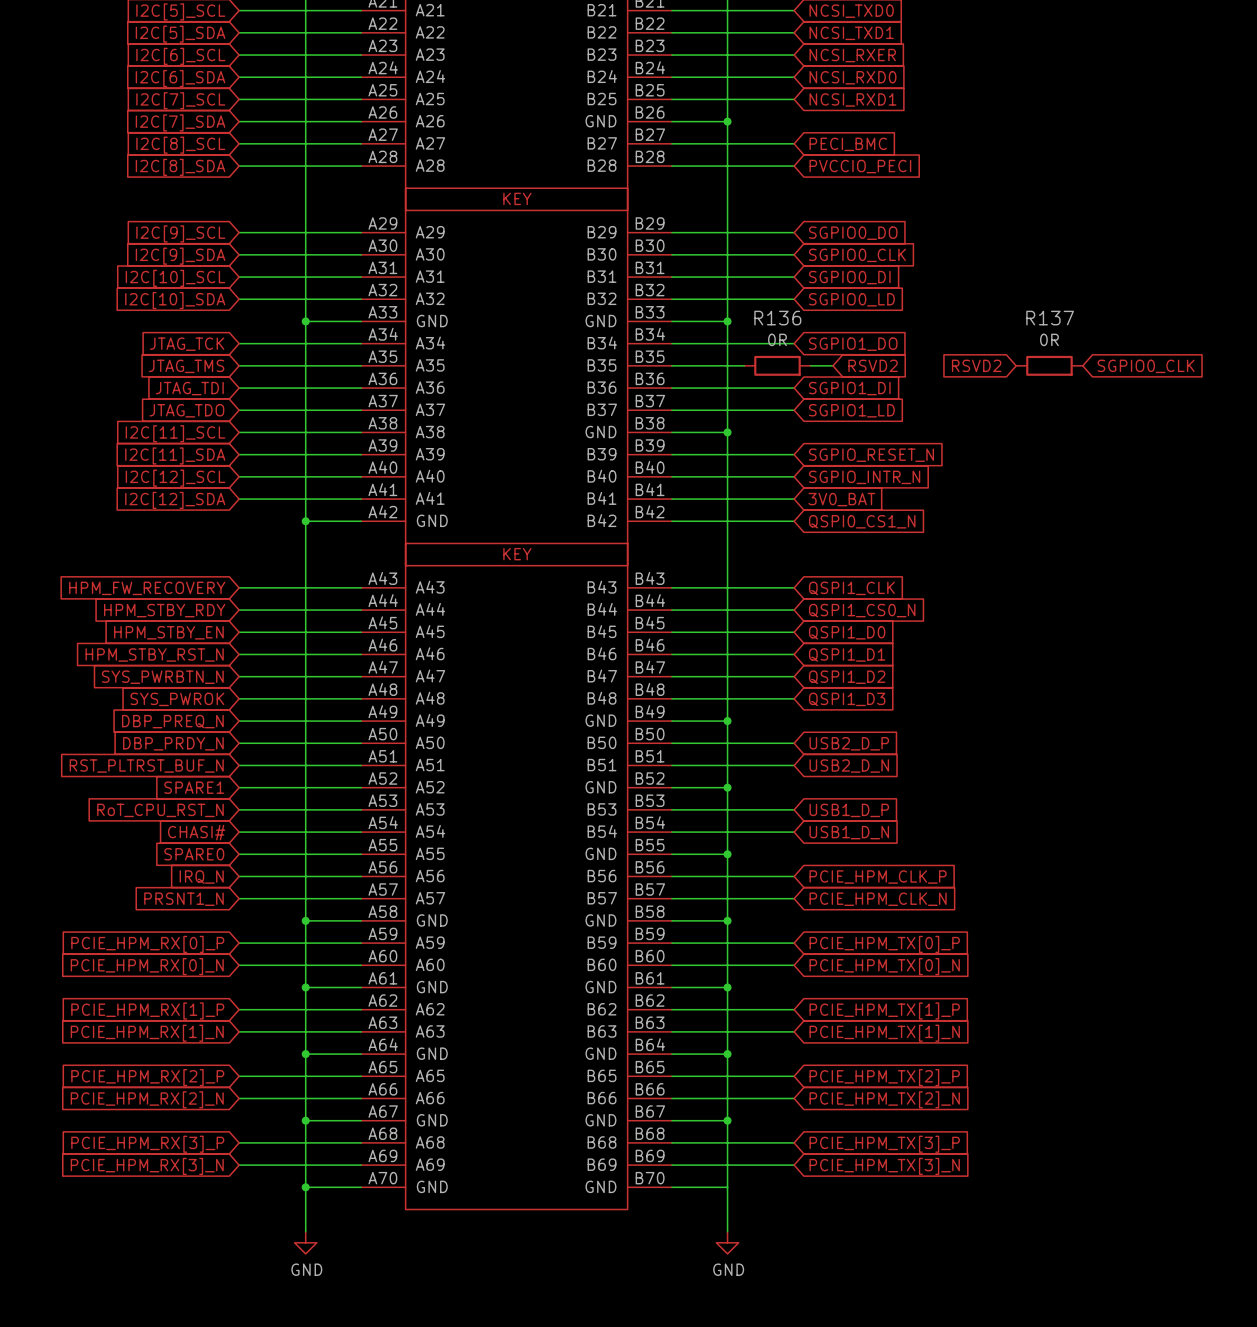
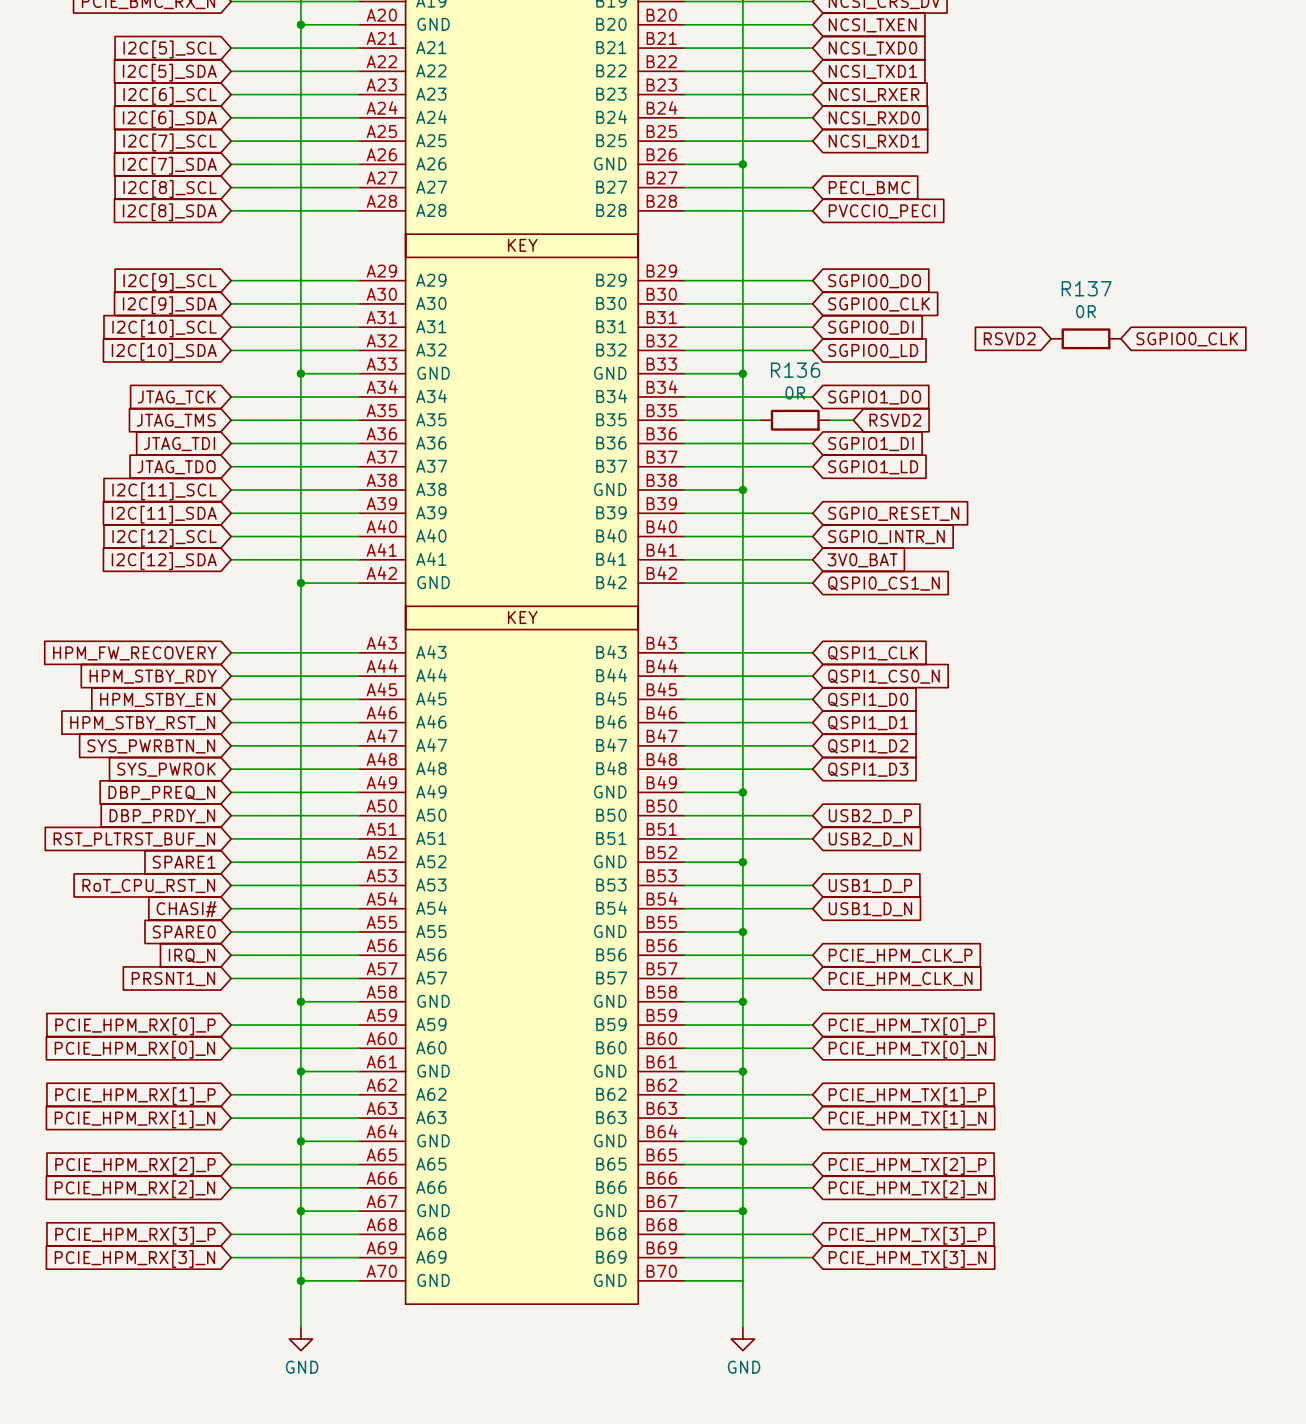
global label position: RSVD2 (976, 365) -> RSVD2 (1009, 338)
R137 position: (1049, 365) -> (1086, 338)
global label position: SGPIO0_CLK (1146, 366) -> SGPIO0_CLK (1187, 339)

